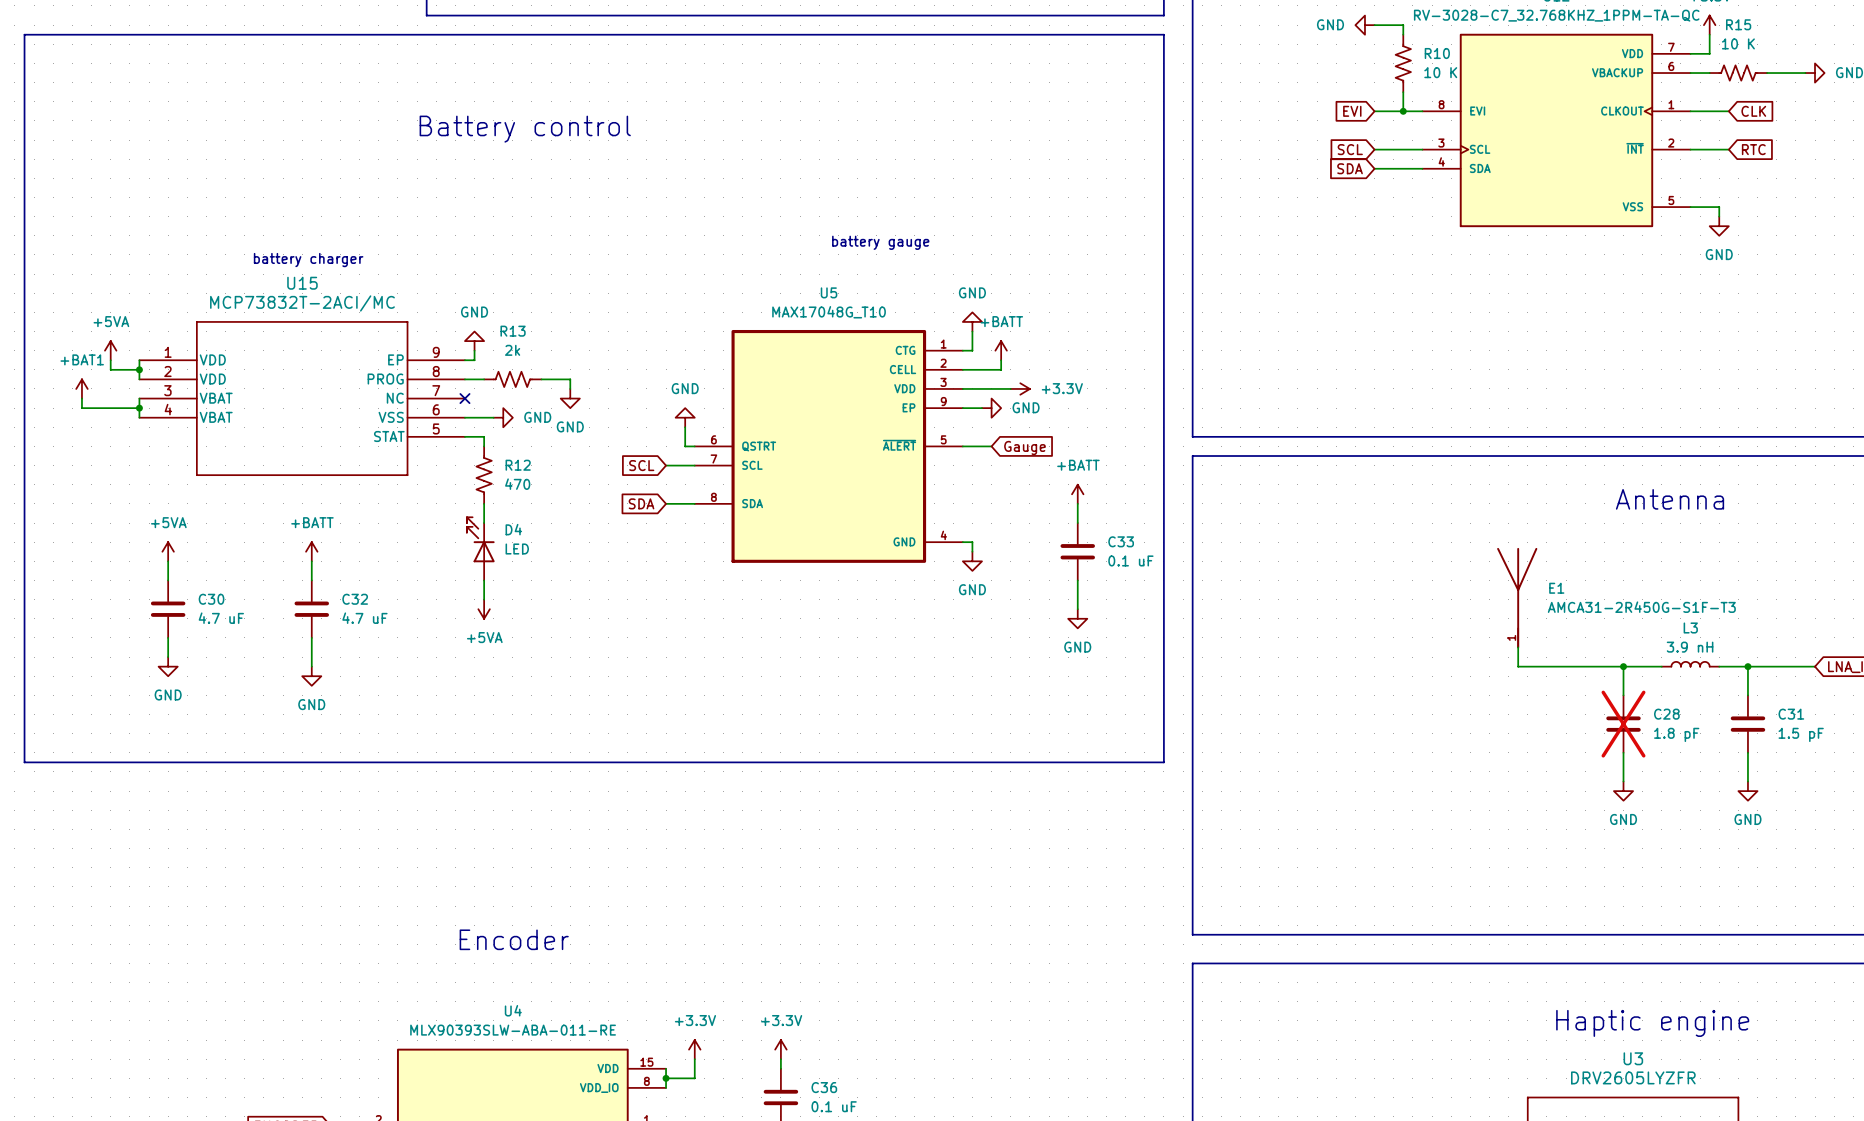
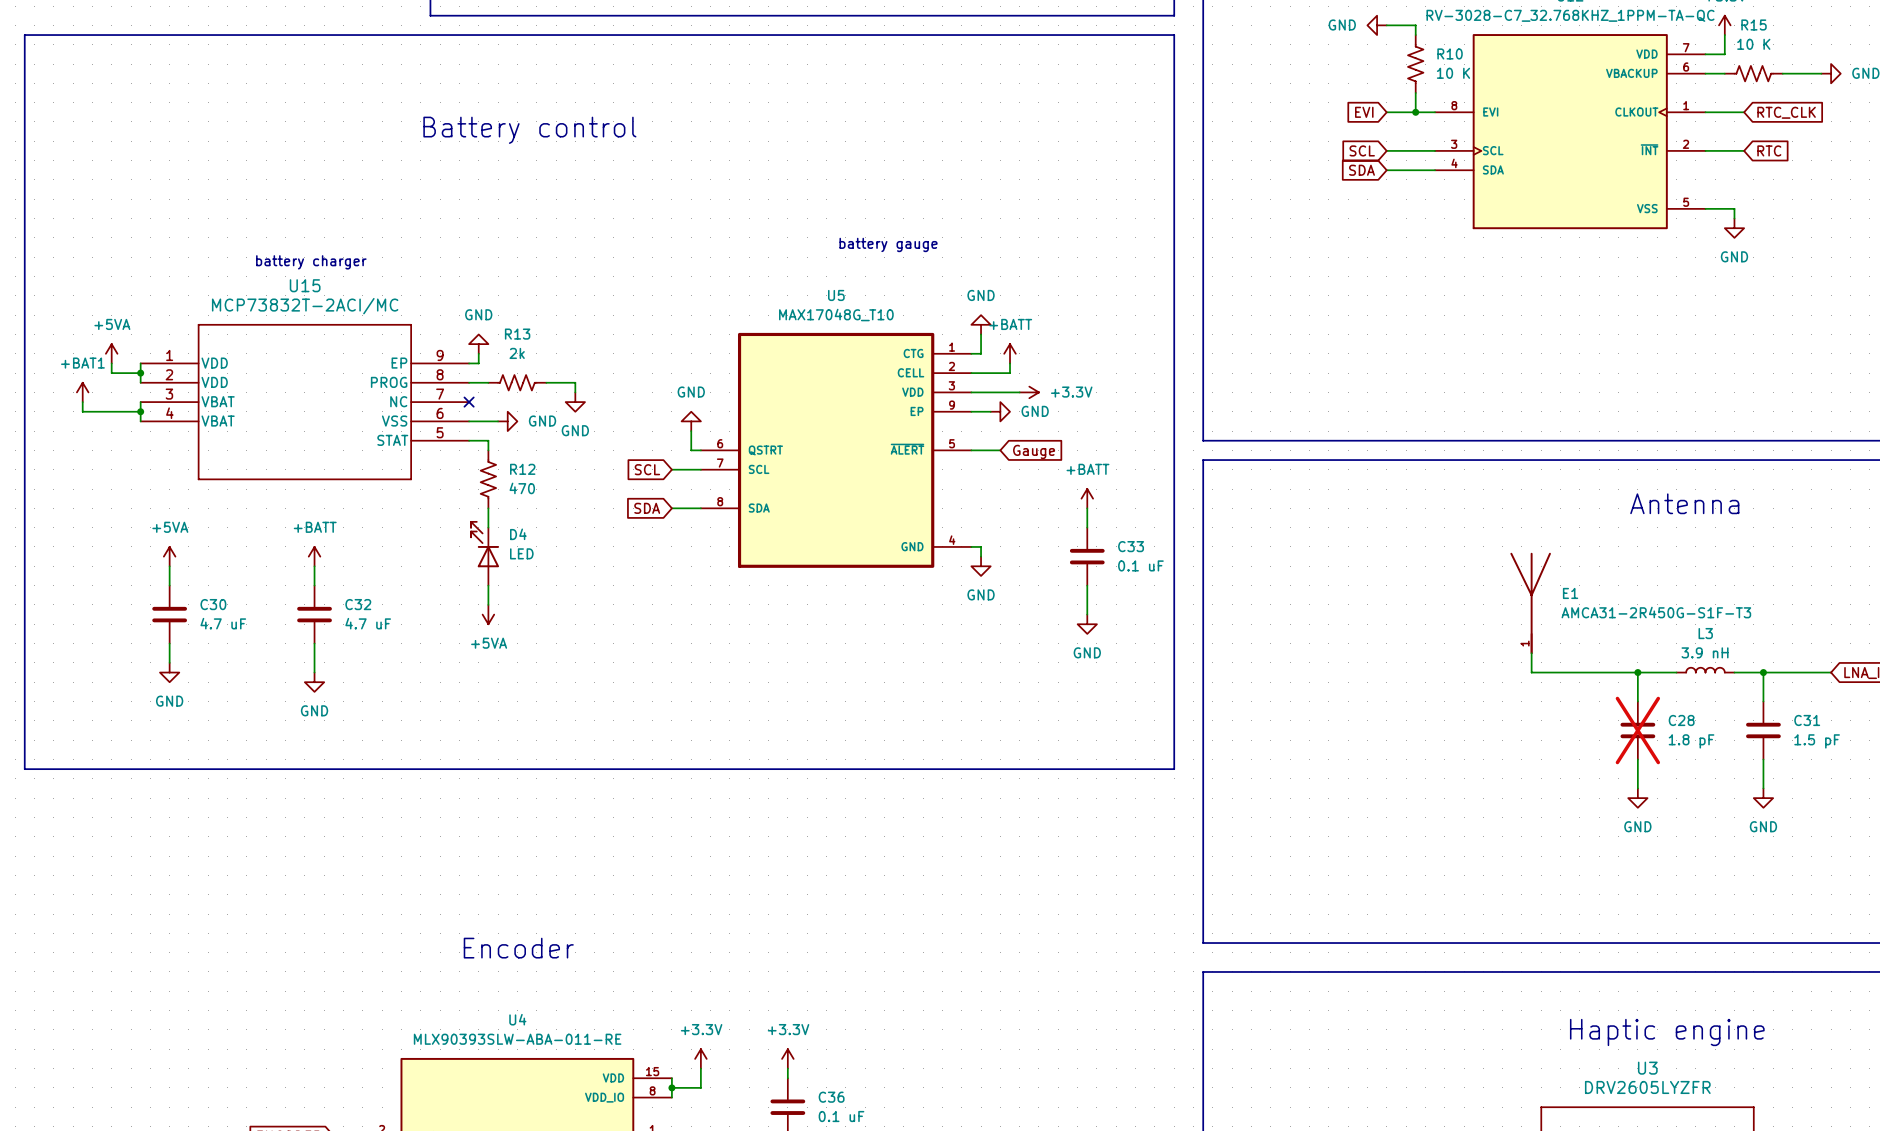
global label: CLK (1753, 111) -> RTC_CLK (1786, 112)

